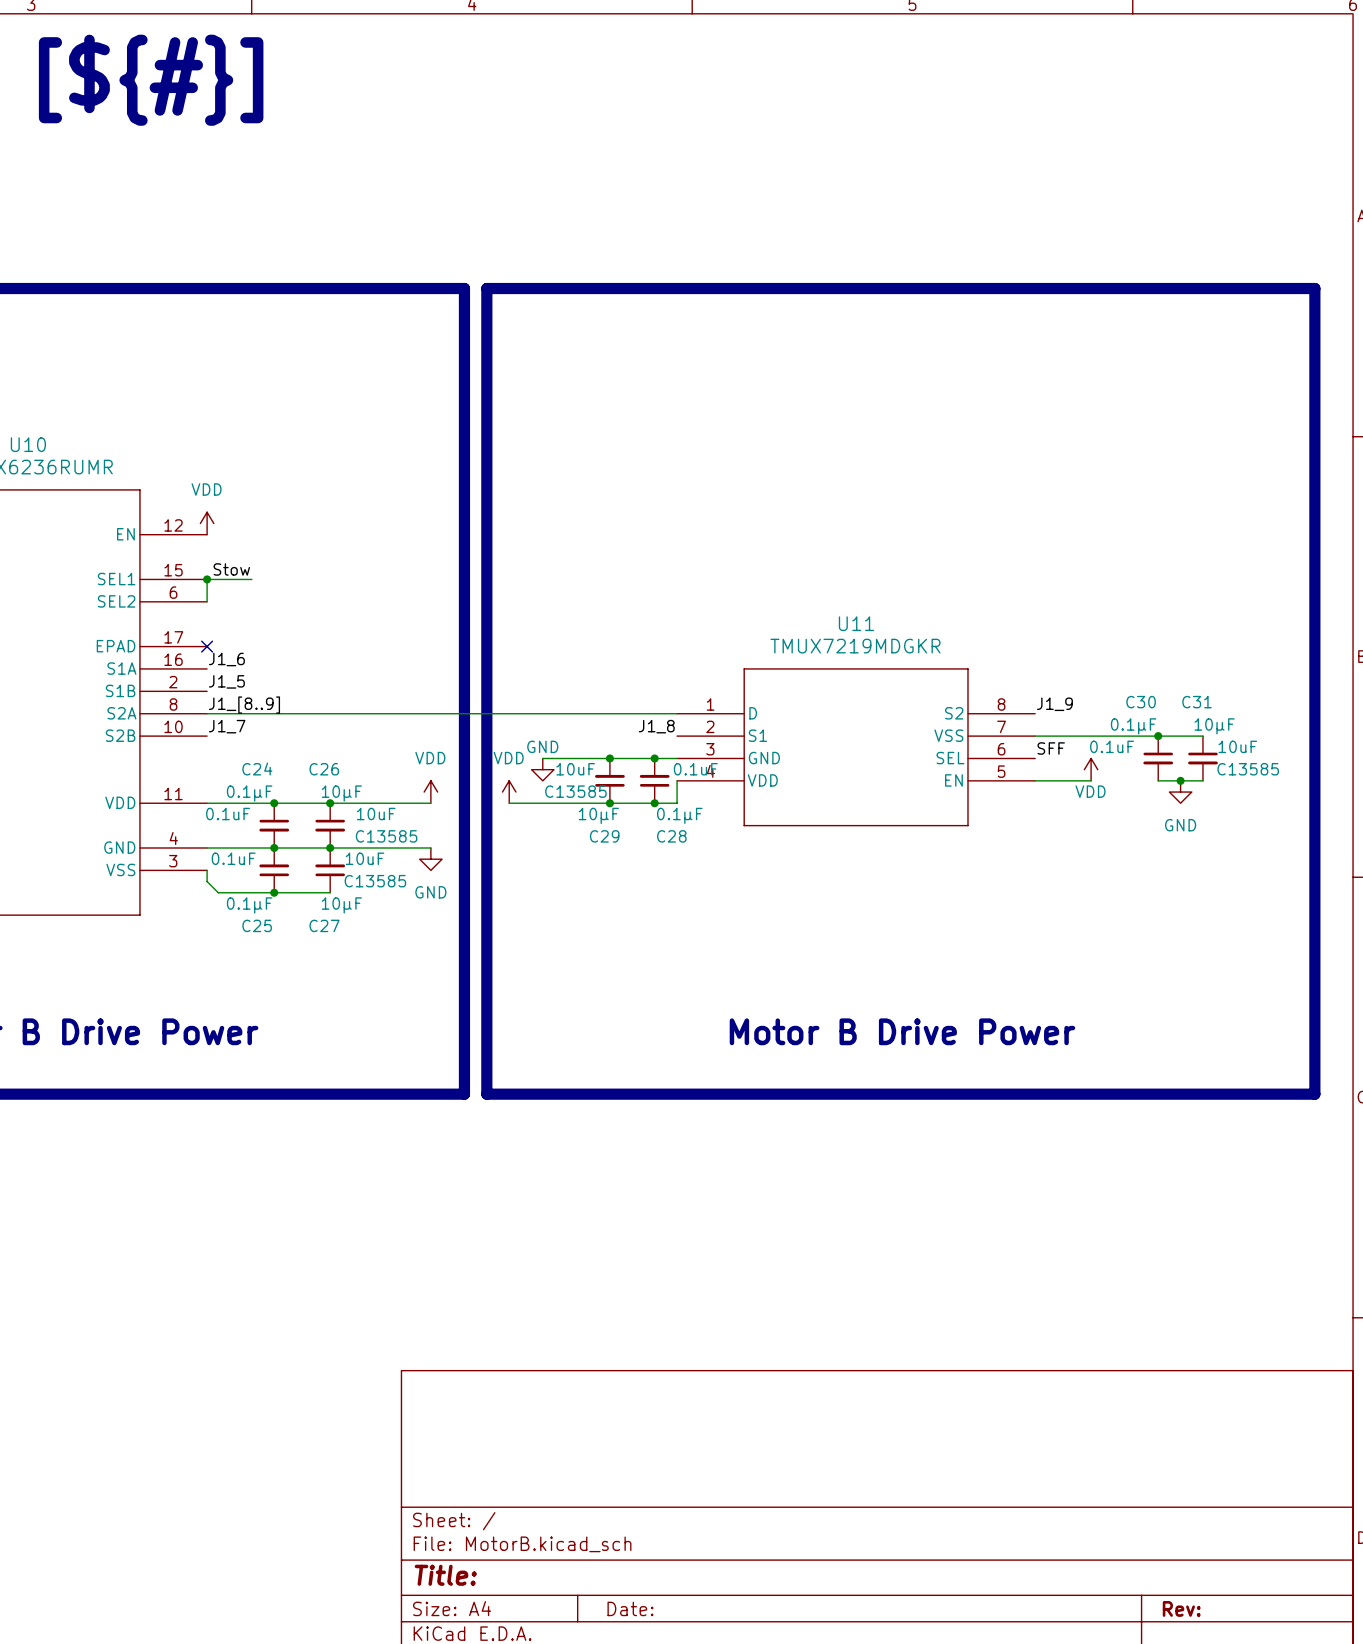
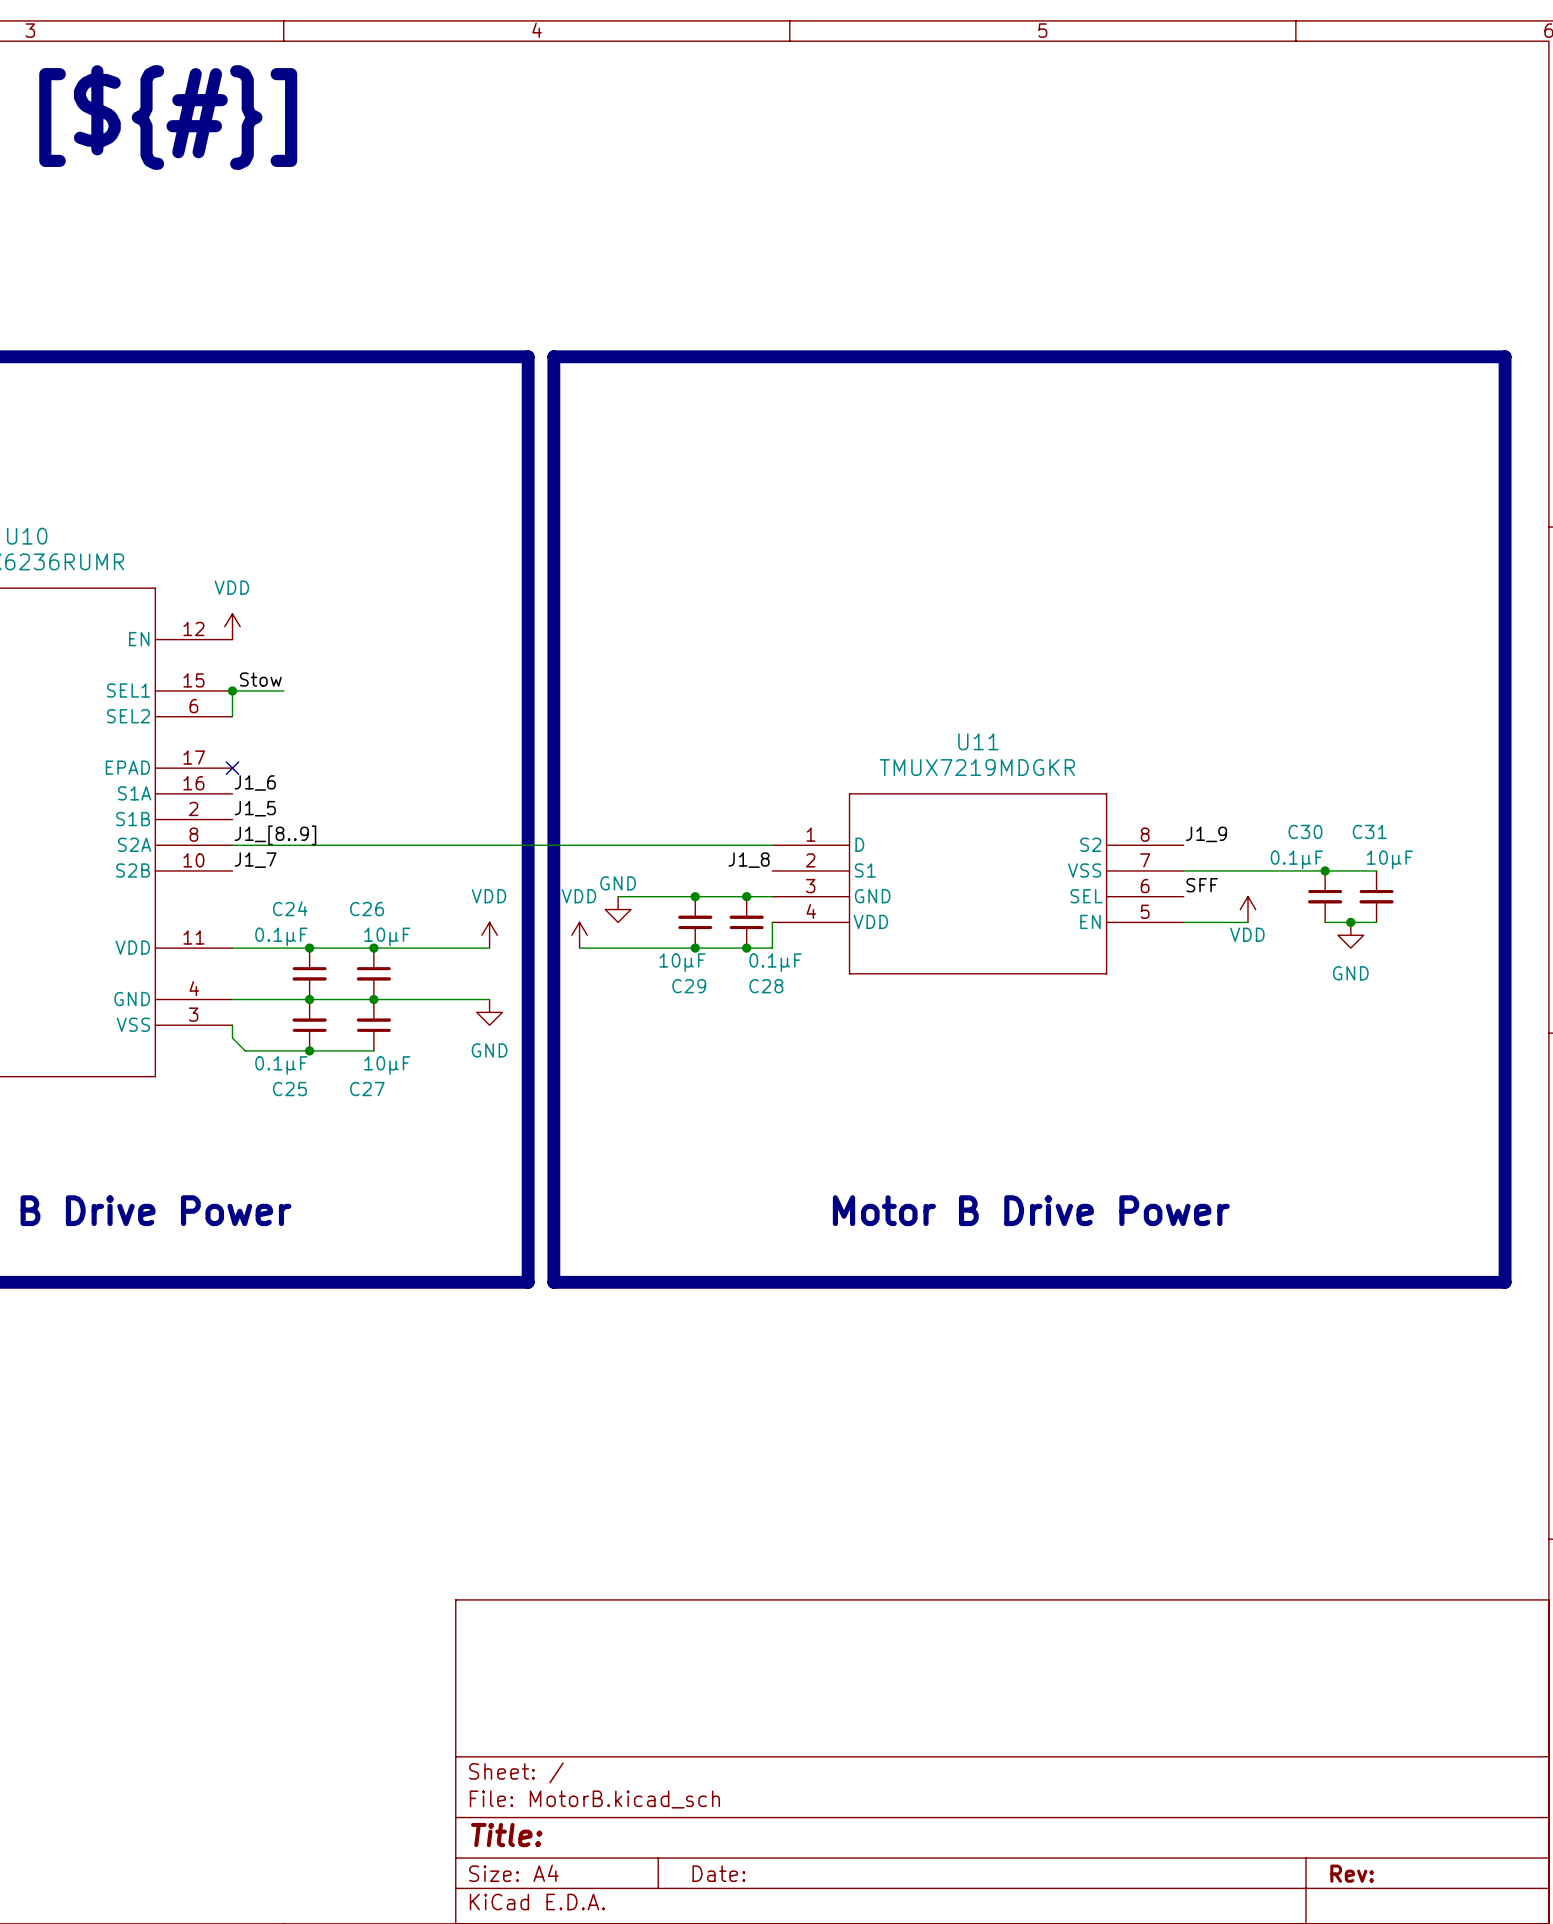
C30 text: 0.1uF (1112, 746) -> none
C31 text: 10uF (1237, 746) -> none
C29 text: 10uF (575, 769) -> none
C28 text: 0.1uF (695, 769) -> none
C31 text: C13585 (1248, 769) -> none
C29 text: C13585 (575, 791) -> none
C24 text: 0.1uF (228, 814) -> none
C26 text: 10uF (376, 814) -> none
C26 text: C13585 (386, 836) -> none
C25 text: 0.1uF (233, 858) -> none
C27 text: 10uF (365, 858) -> none
C27 text: C13585 (375, 881) -> none

